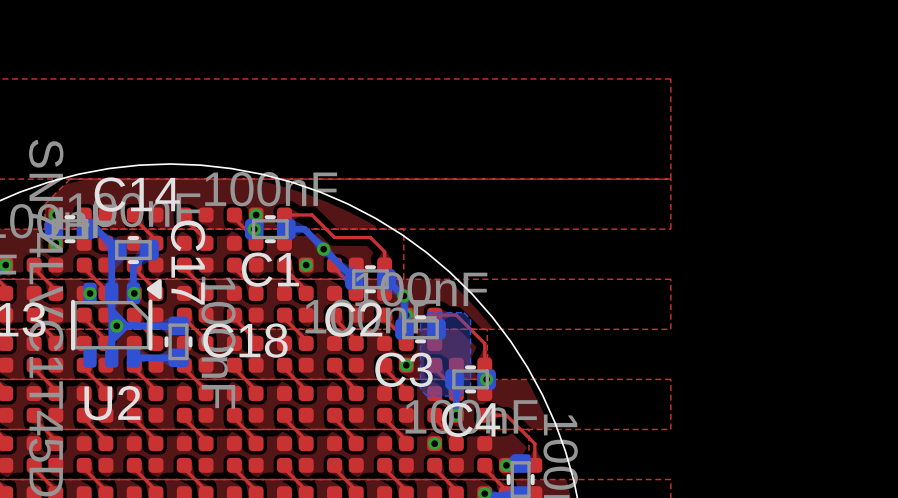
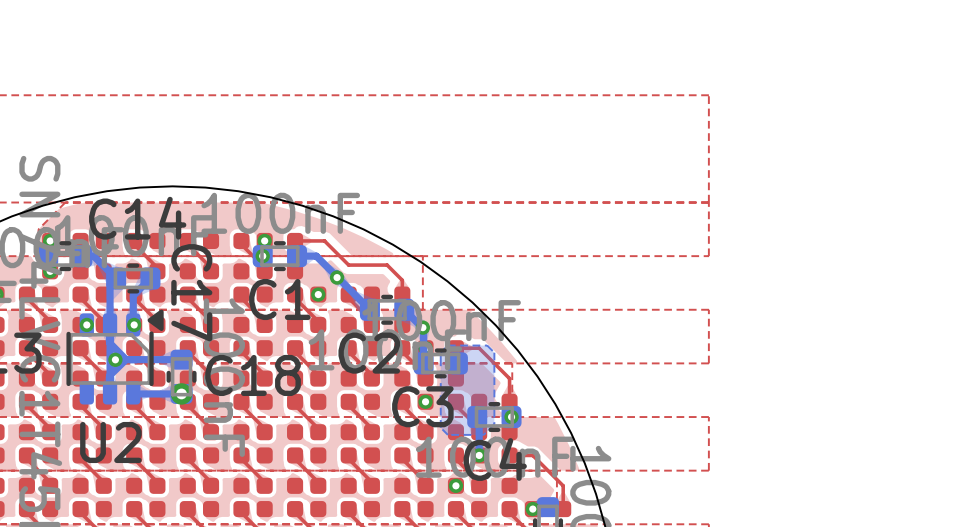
via: none -> (181, 393)

